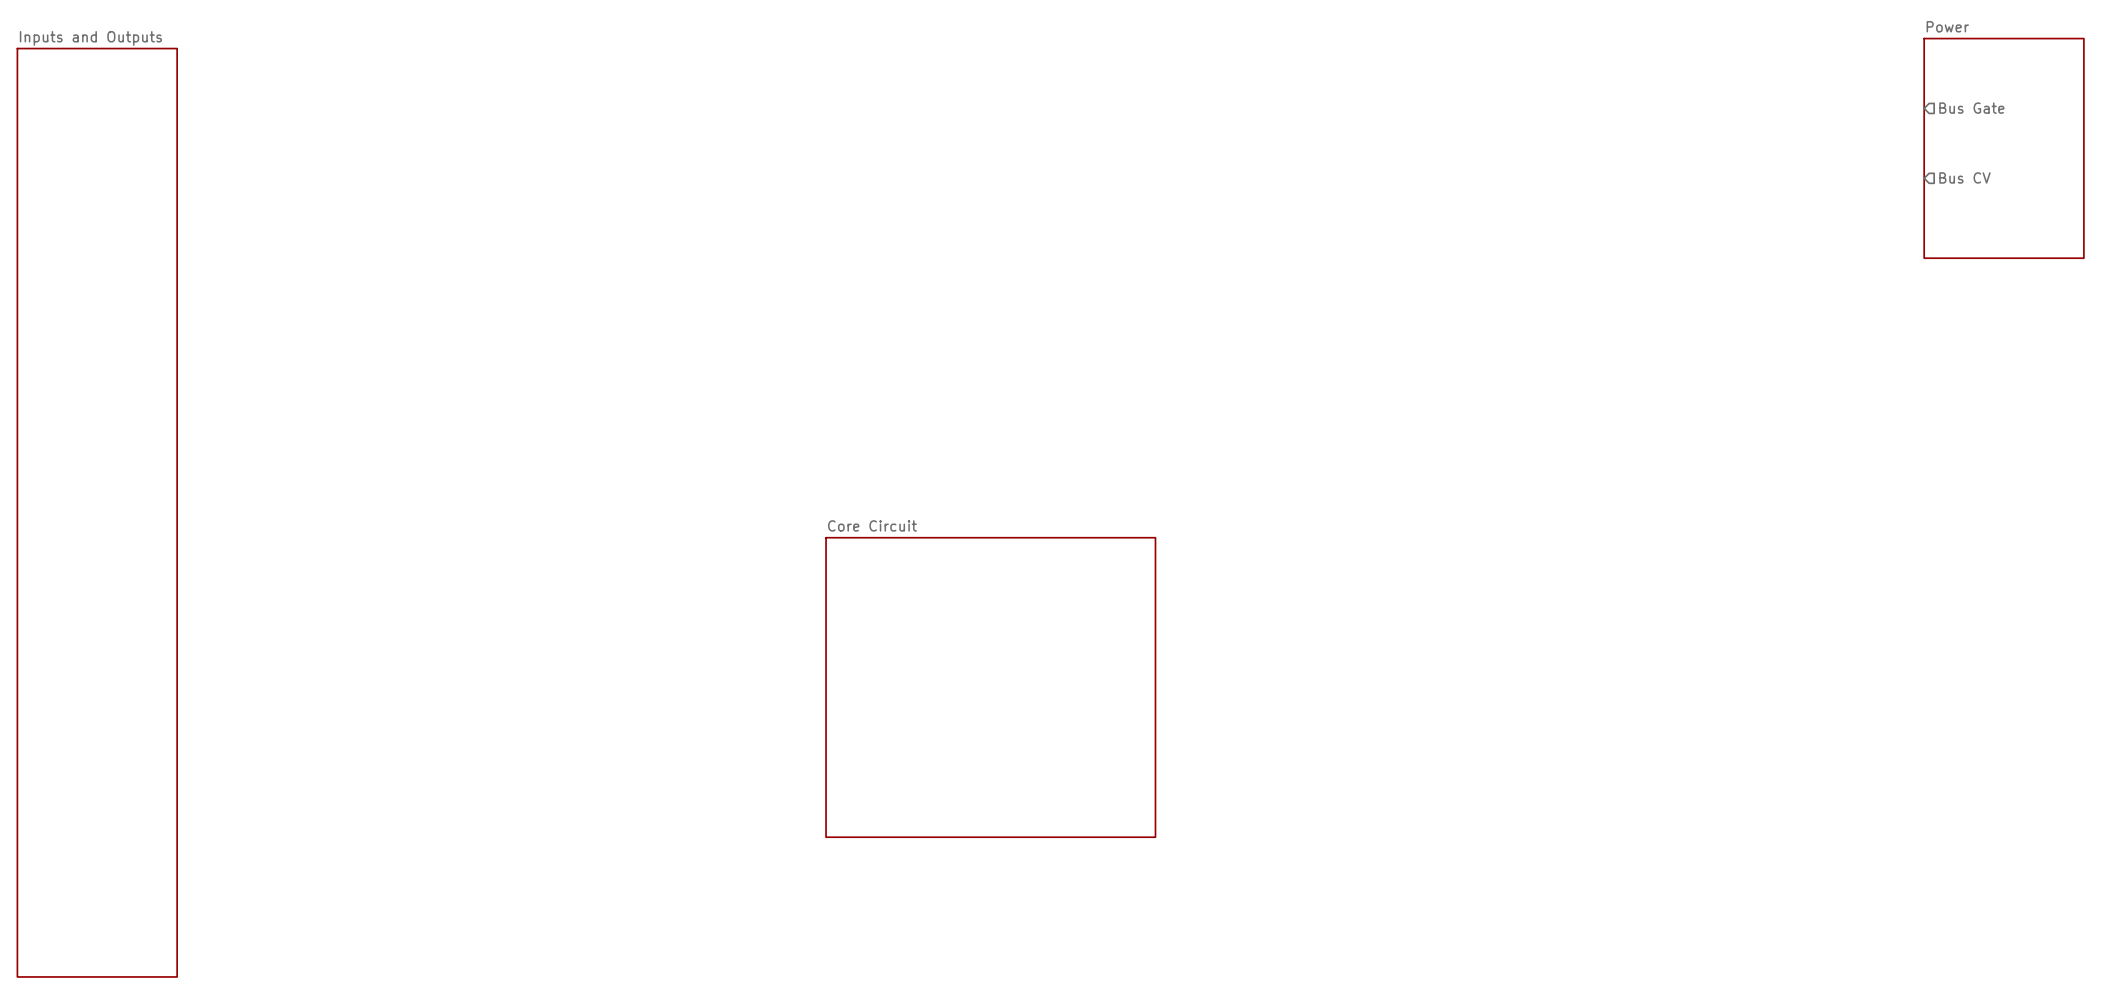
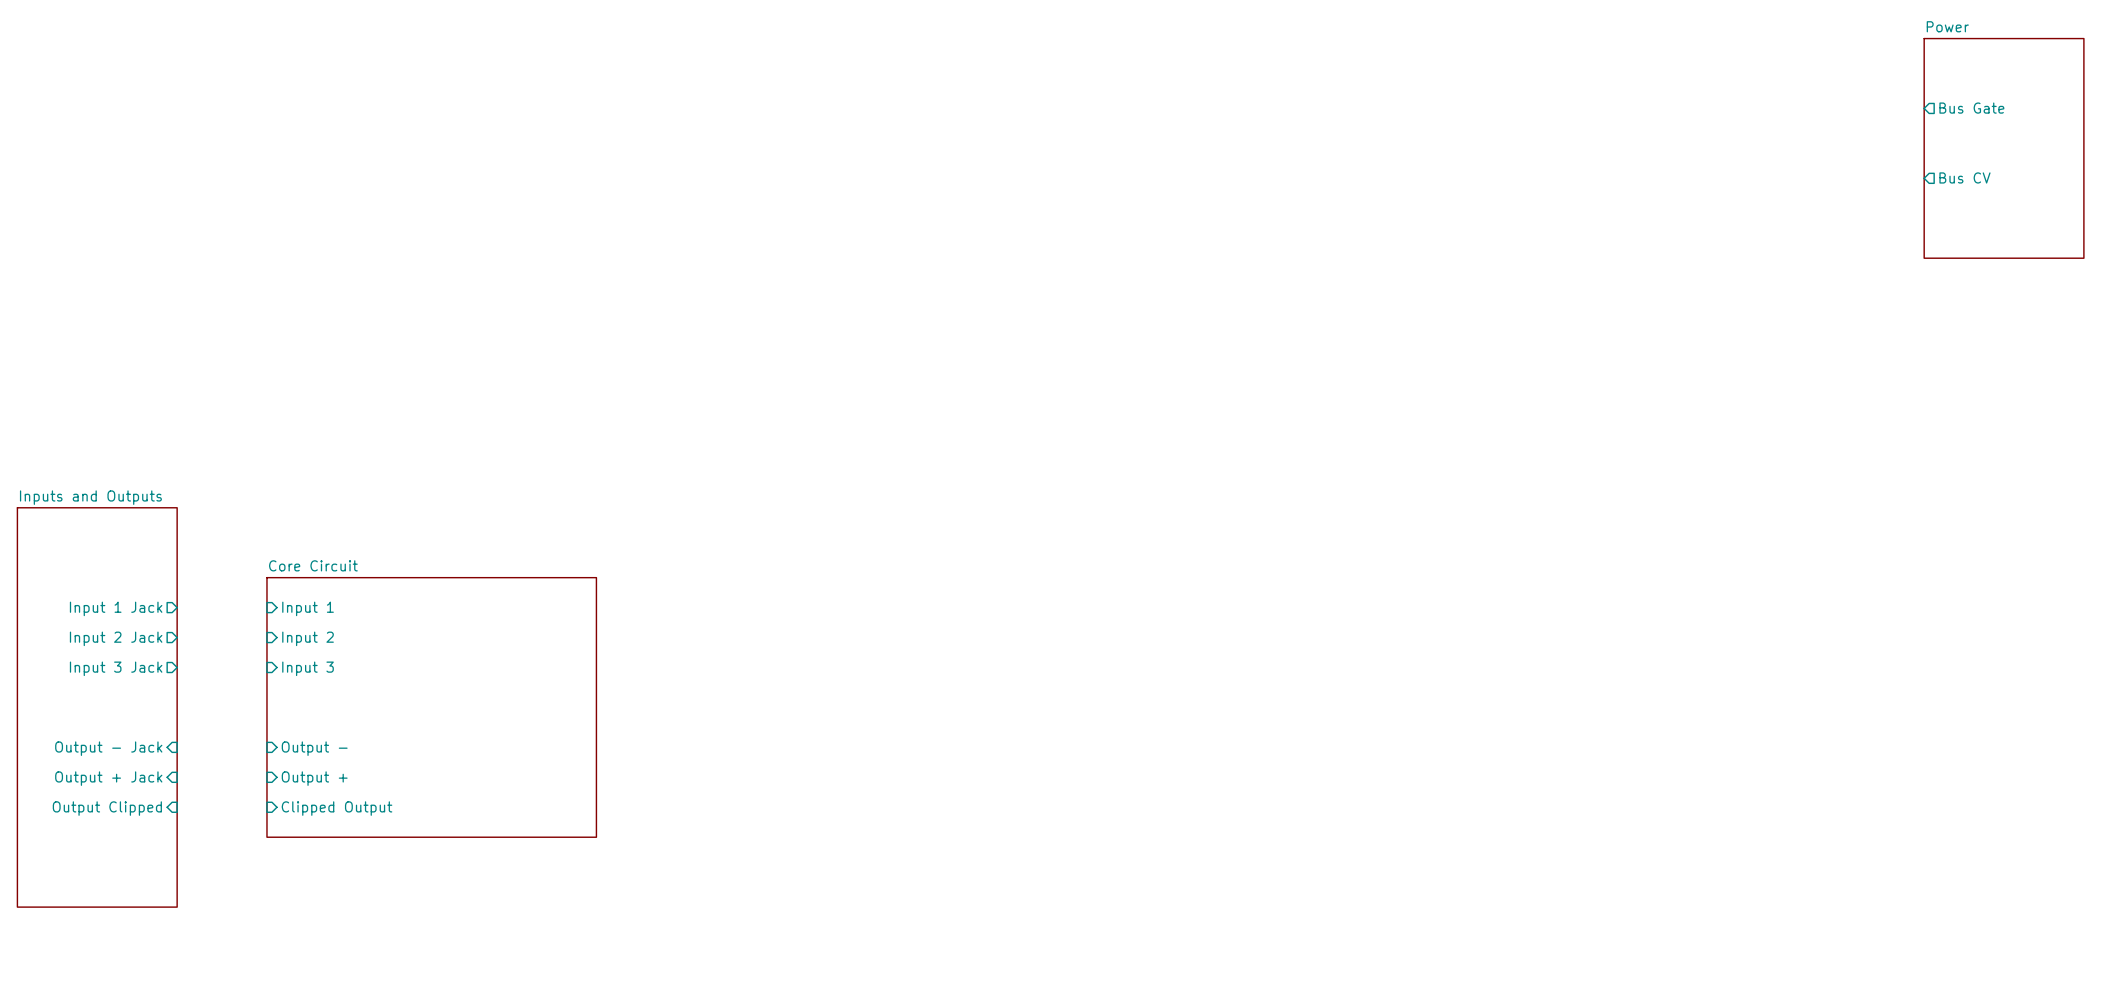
sheet Inputs and Outputs: (97, 512) -> none
sheet pin: none -> Input 1 Jack (116, 608)
sheet pin: none -> Input 1 (308, 608)
sheet pin: none -> Input 2 Jack (116, 638)
sheet pin: none -> Input 2 (308, 638)
sheet pin: none -> Input 3 Jack (116, 668)
sheet pin: none -> Input 3 (308, 668)
sheet Core Circuit: (990, 687) -> none
sheet Inputs and Outputs: none -> (97, 707)
sheet Core Circuit: none -> (431, 707)
sheet pin: none -> Output - Jack (108, 748)
sheet pin: none -> Output - (314, 748)
sheet pin: none -> Output + Jack (108, 778)
sheet pin: none -> Output + (314, 778)
sheet pin: none -> Output Clipped (107, 808)
sheet pin: none -> Clipped Output (337, 808)

